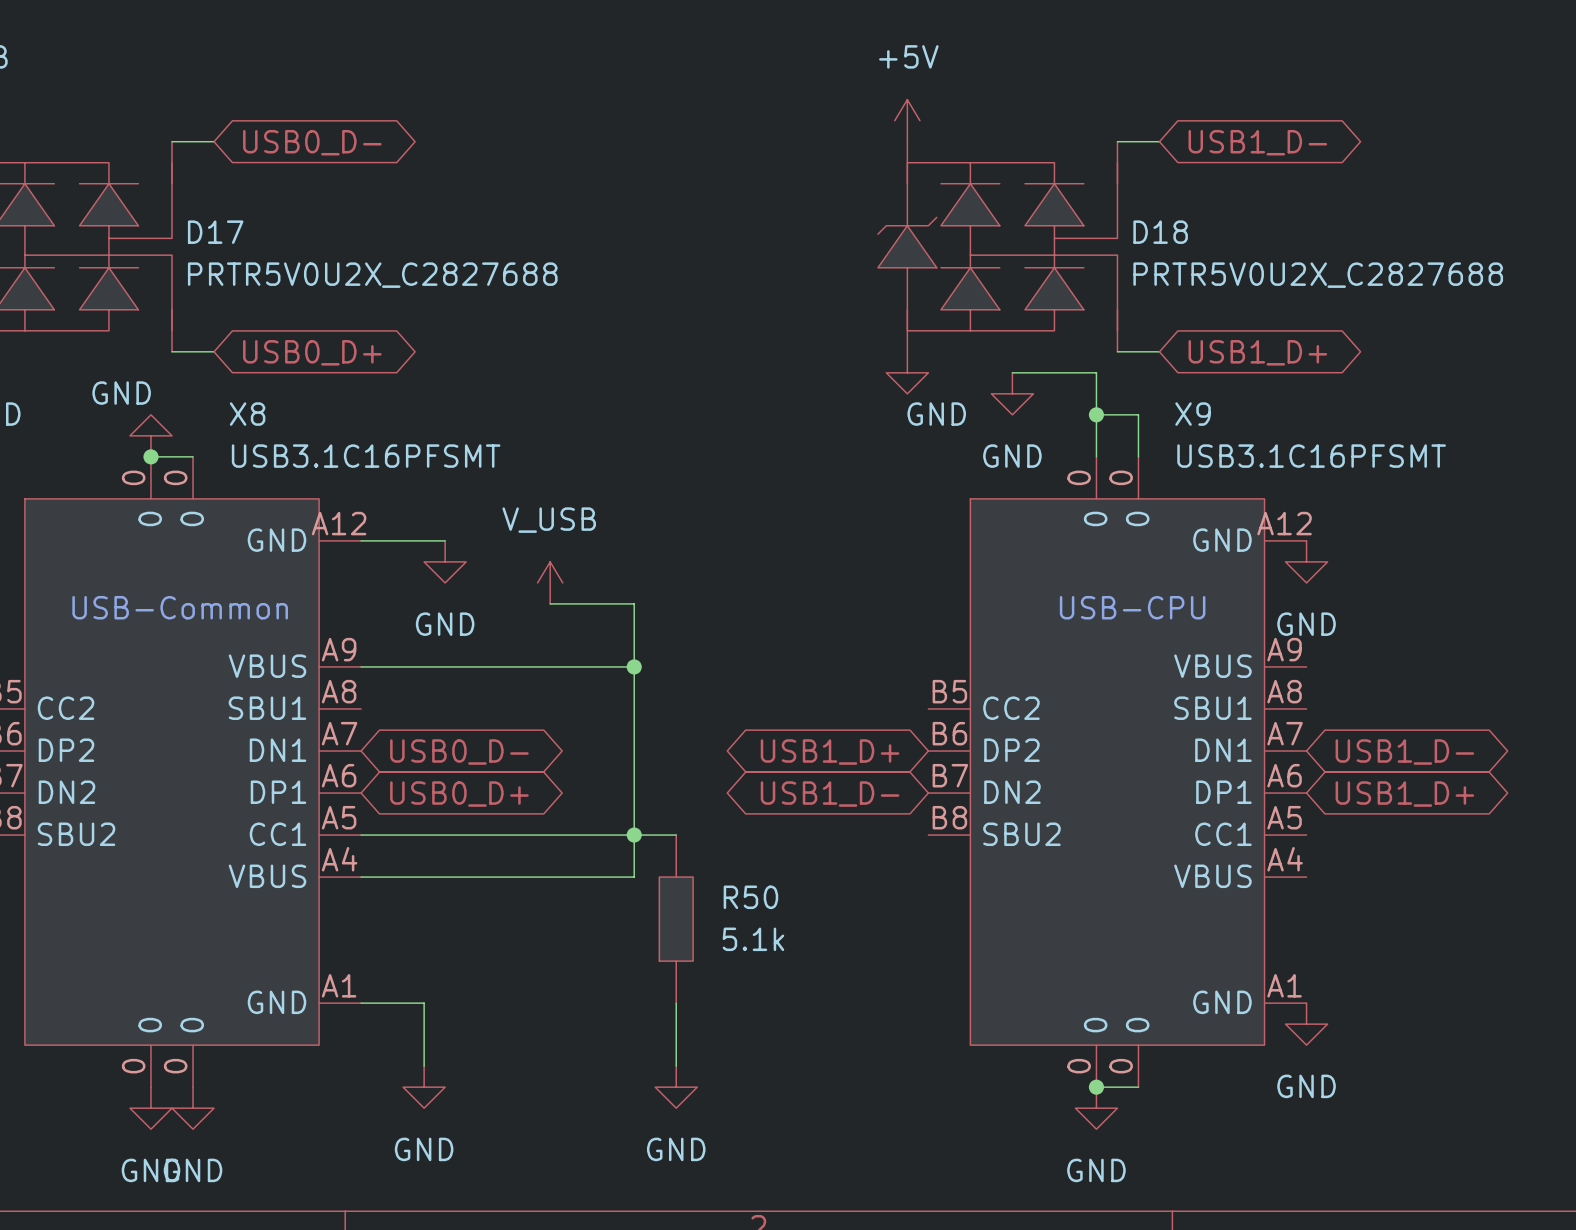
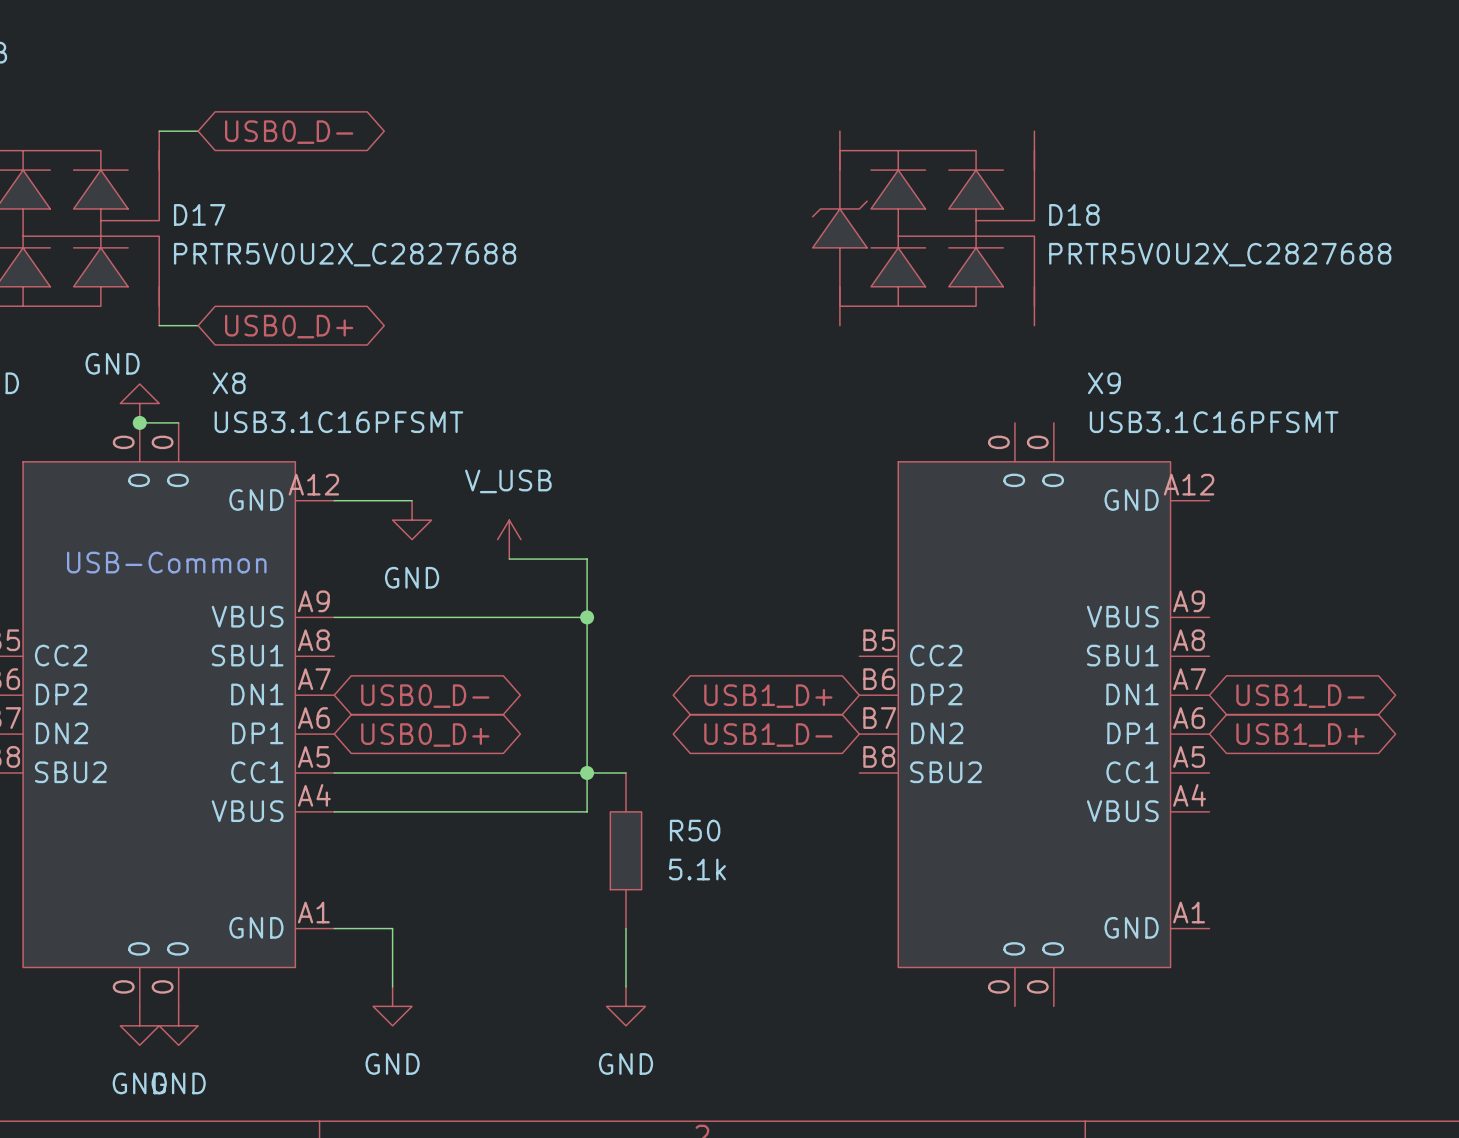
power symbol: +5V (907, 120) -> none
wire: (1117, 141) (1159, 141) -> none
global label: USB1_D- (1257, 142) -> none
wire: (1117, 351) (1159, 351) -> none
global label: USB1_D+ (1257, 352) -> none
power symbol: GND (907, 372) -> none
wire: (1012, 372) (1096, 372) (1096, 456) -> none
power symbol: GND (1012, 393) -> none
wire: (1096, 414) (1138, 414) (1138, 456) -> none
junction: (1096, 414) -> none
power symbol: GND (1306, 561) -> none
text: USB-CPU (1132, 607) -> none
power symbol: GND (1306, 1024) -> none
wire: (1096, 1087) (1138, 1087) -> none
junction: (1096, 1087) -> none
power symbol: GND (1096, 1108) -> none

